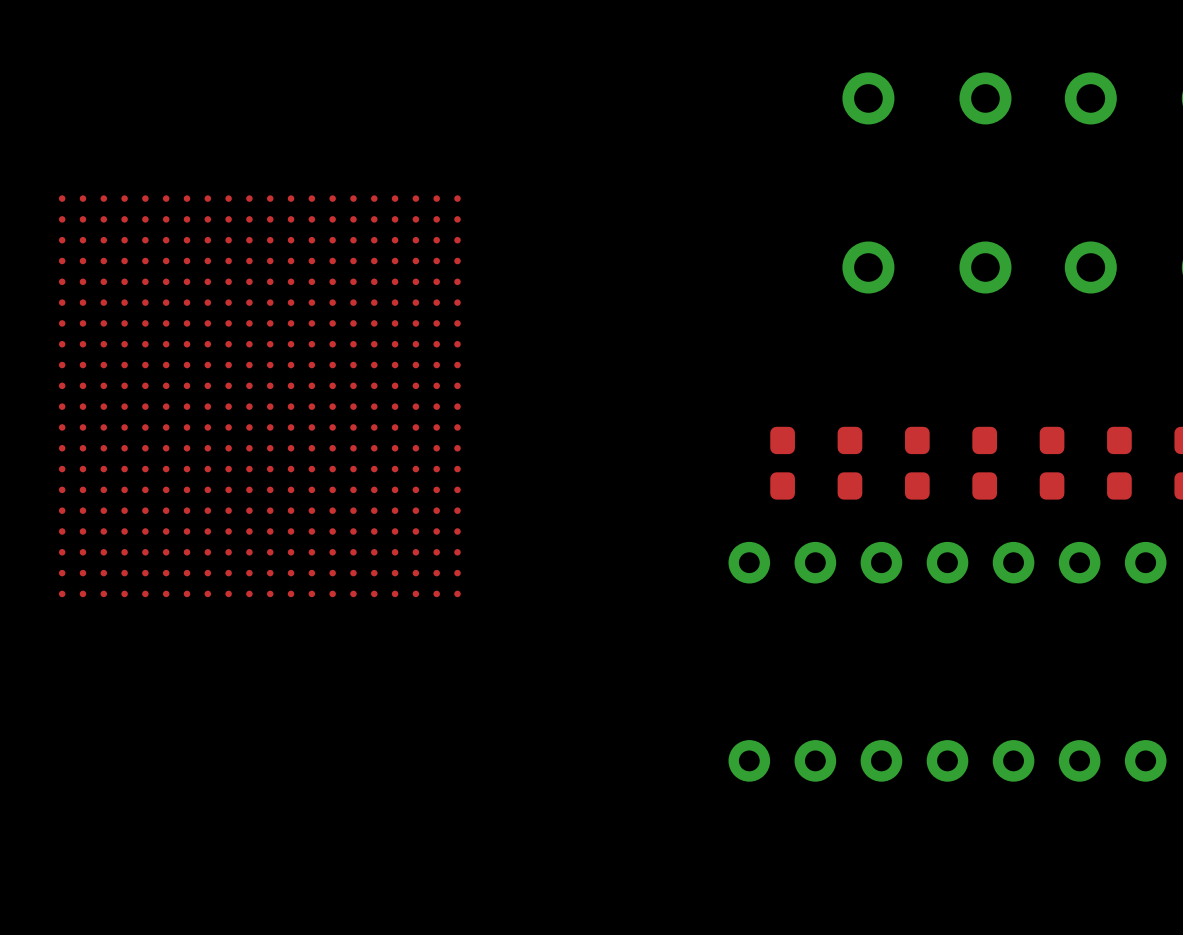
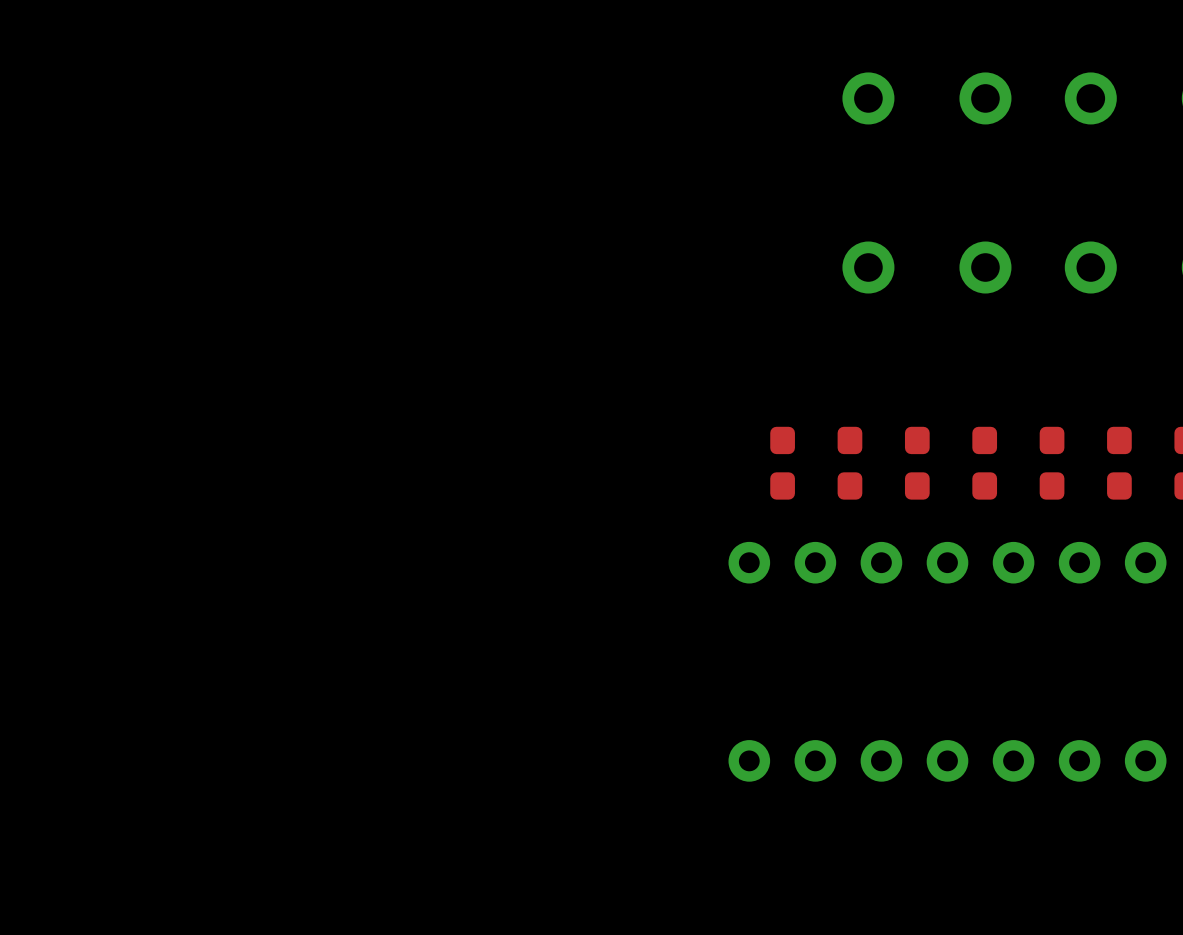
part: (259, 396) -> none

